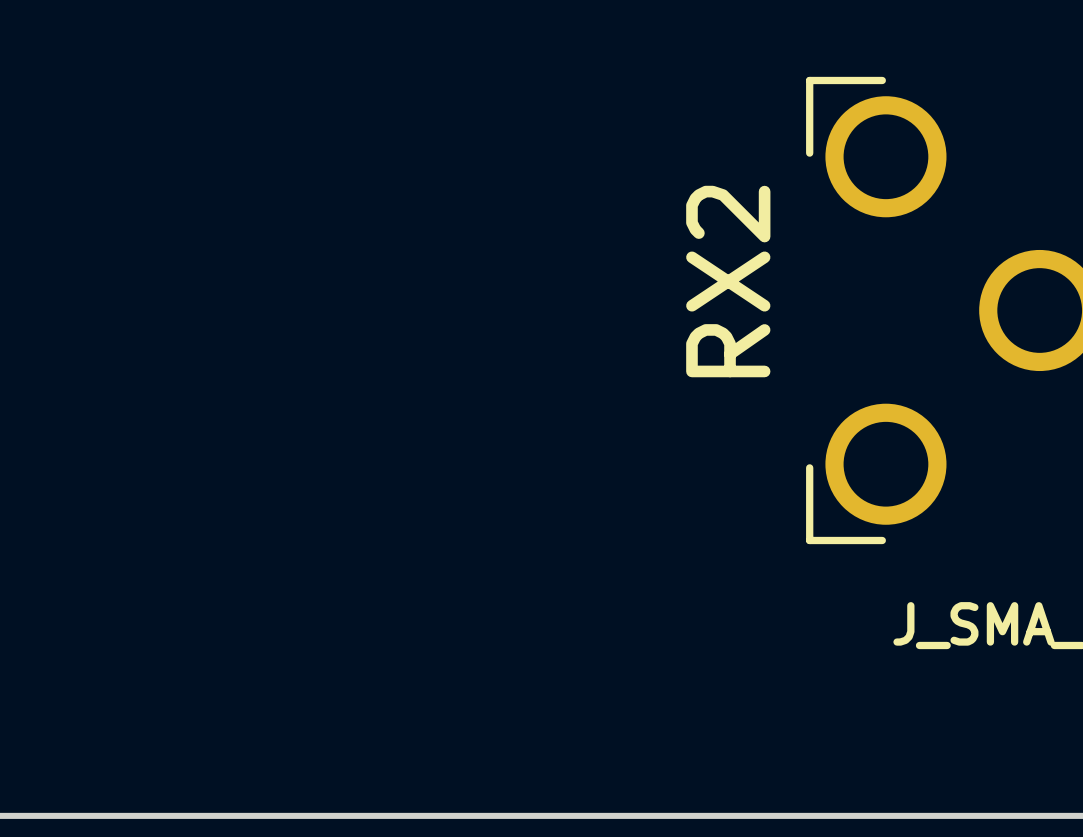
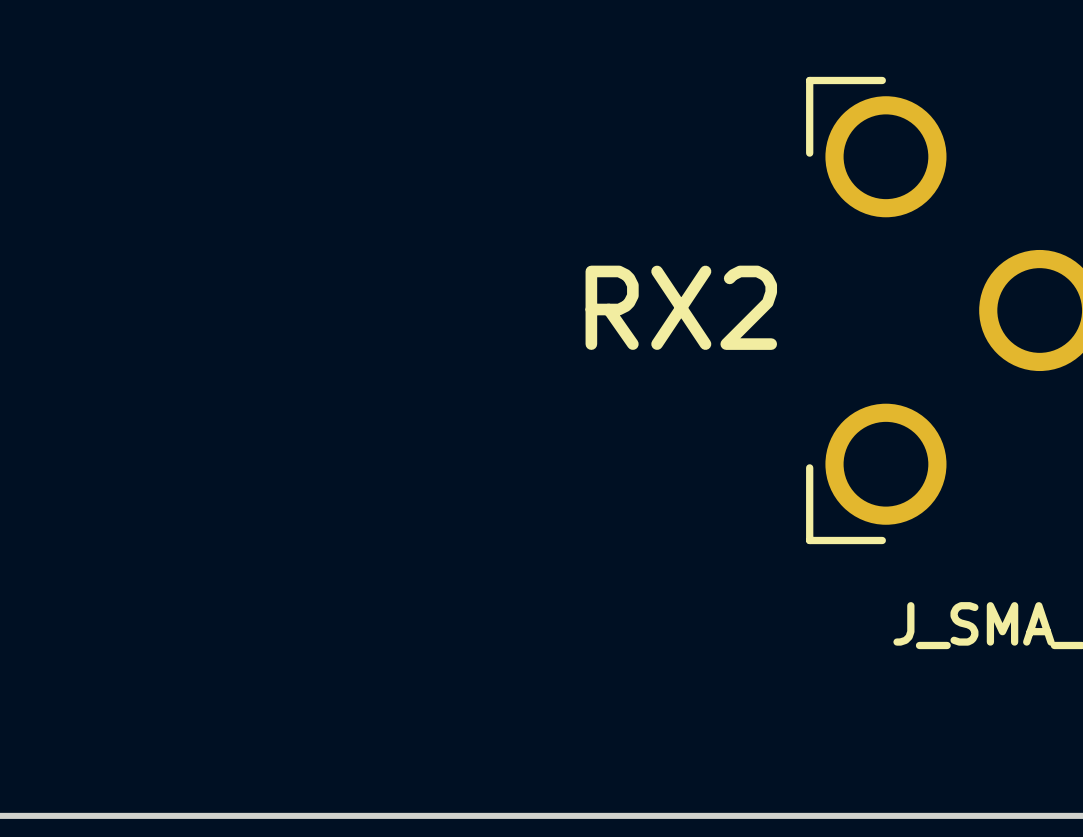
text rotation: 0° (728, 281) -> 90° clockwise (681, 307)

